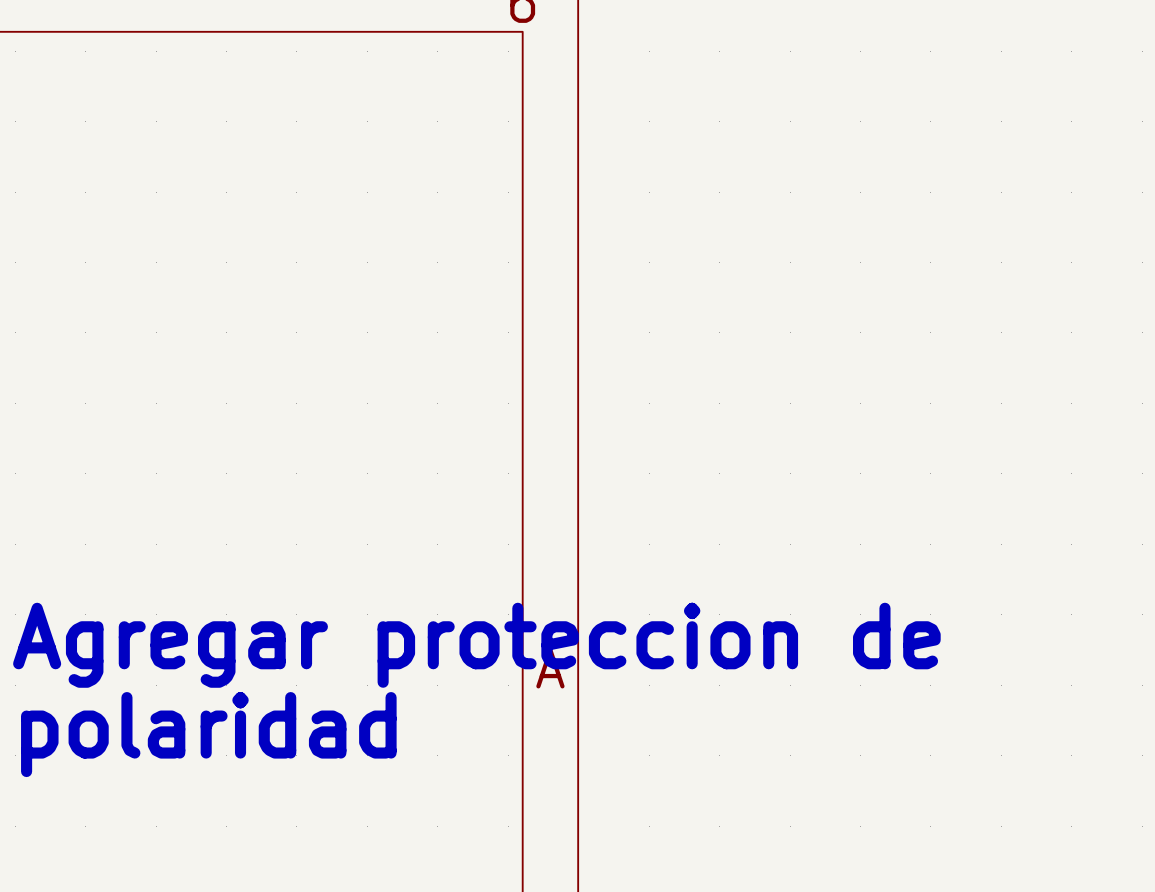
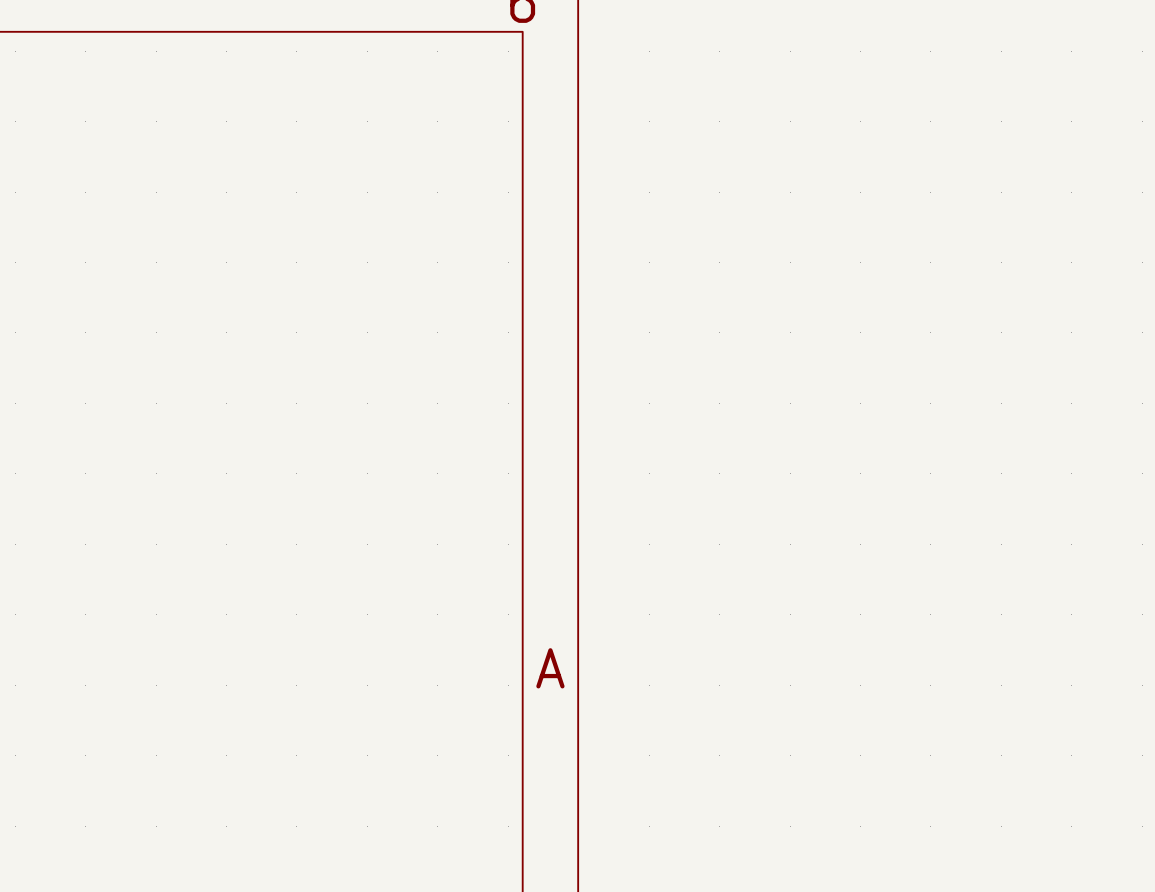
text: Agregar proteccion de (476, 645) -> none
text: polaridad (208, 734) -> none

